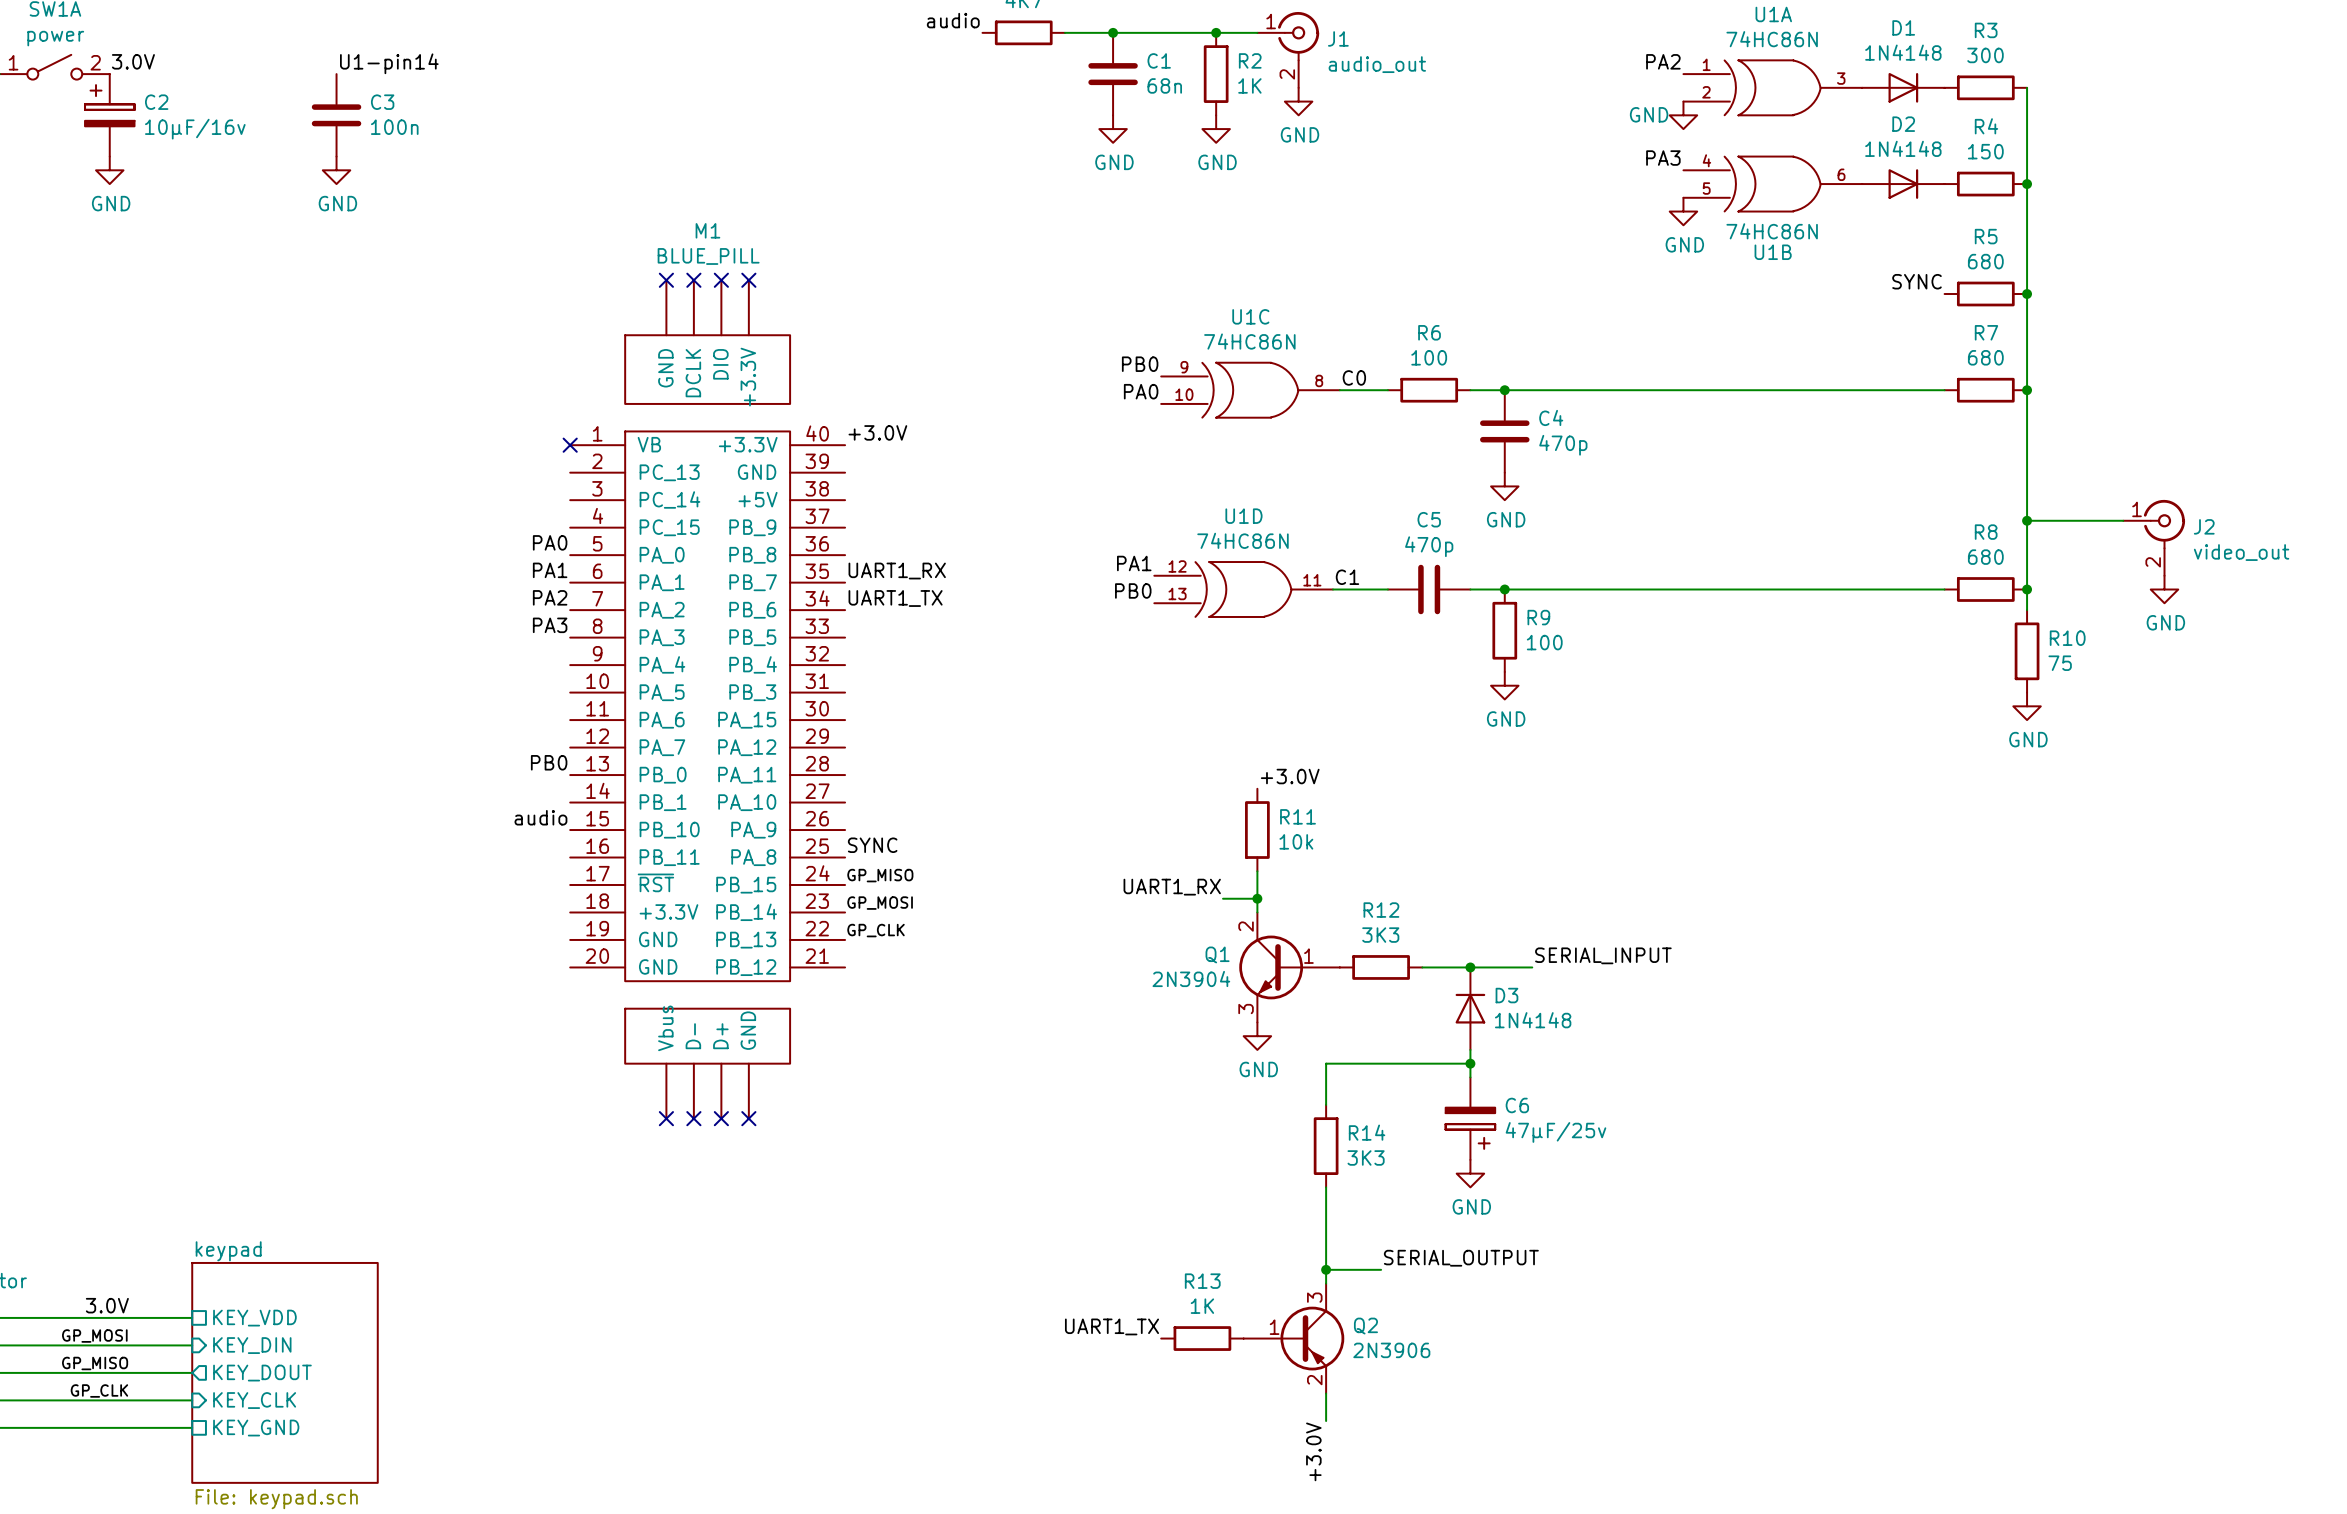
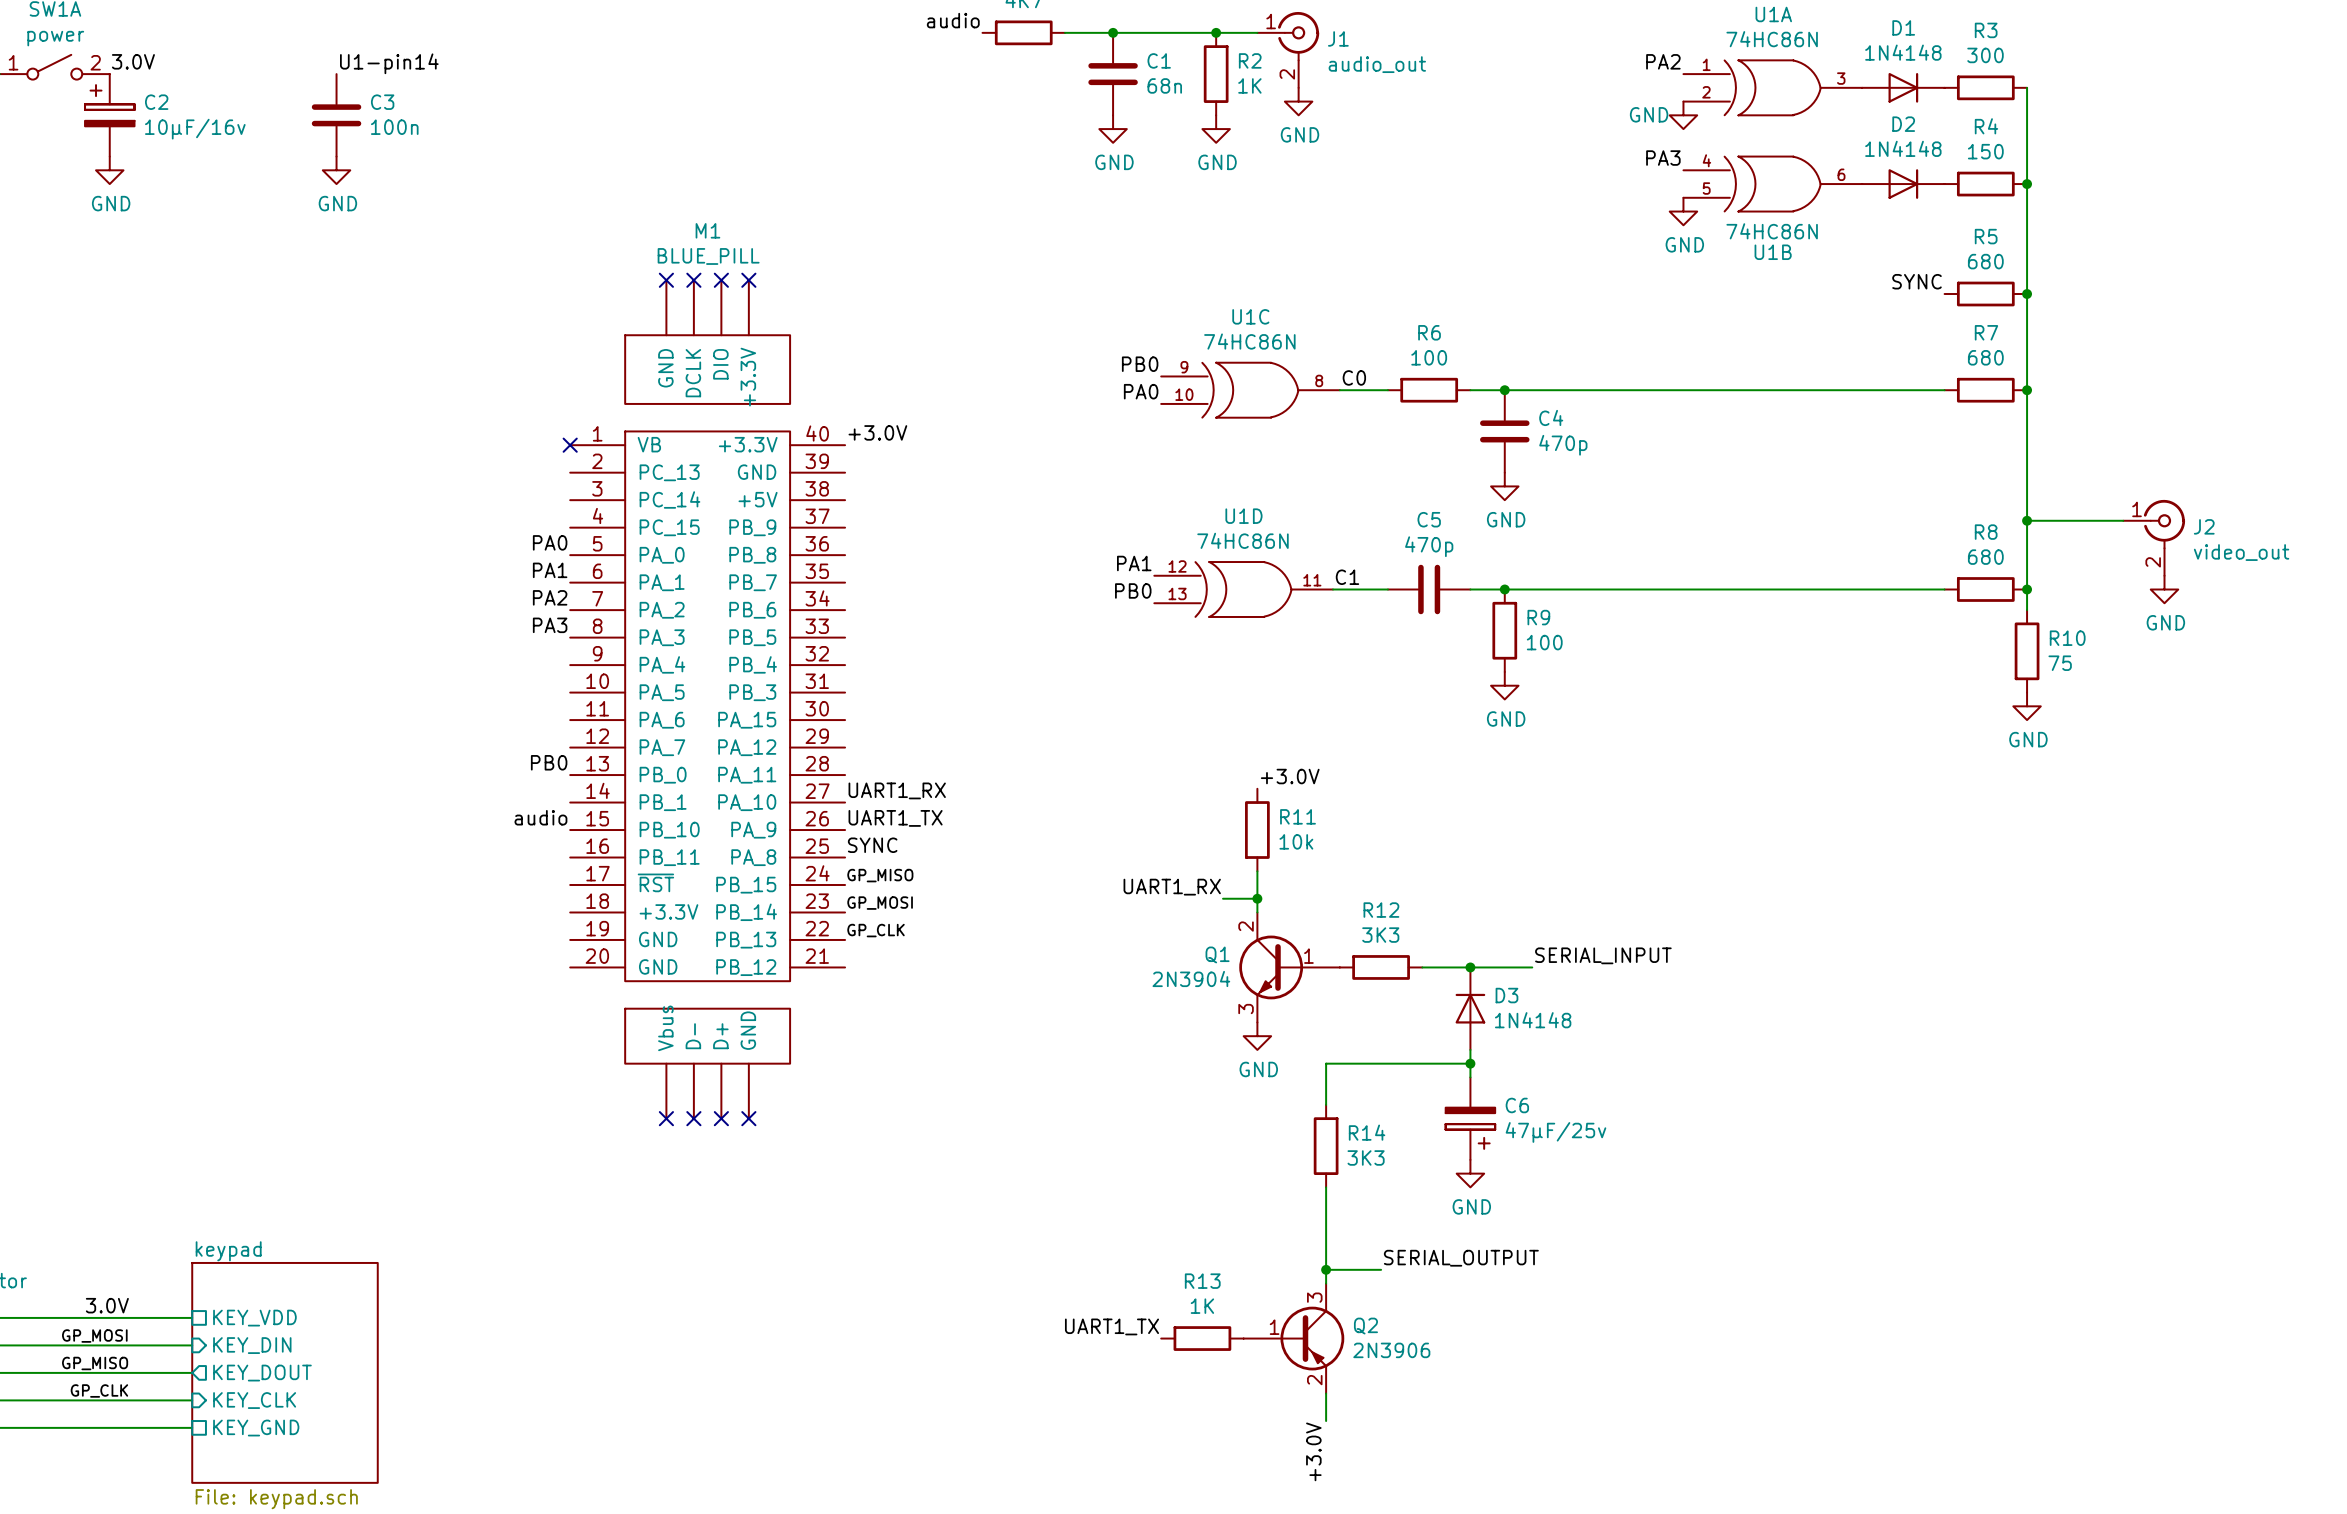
label position: UART1_RX (897, 571) -> UART1_RX (897, 790)
label position: UART1_TX (895, 598) -> UART1_TX (895, 818)

